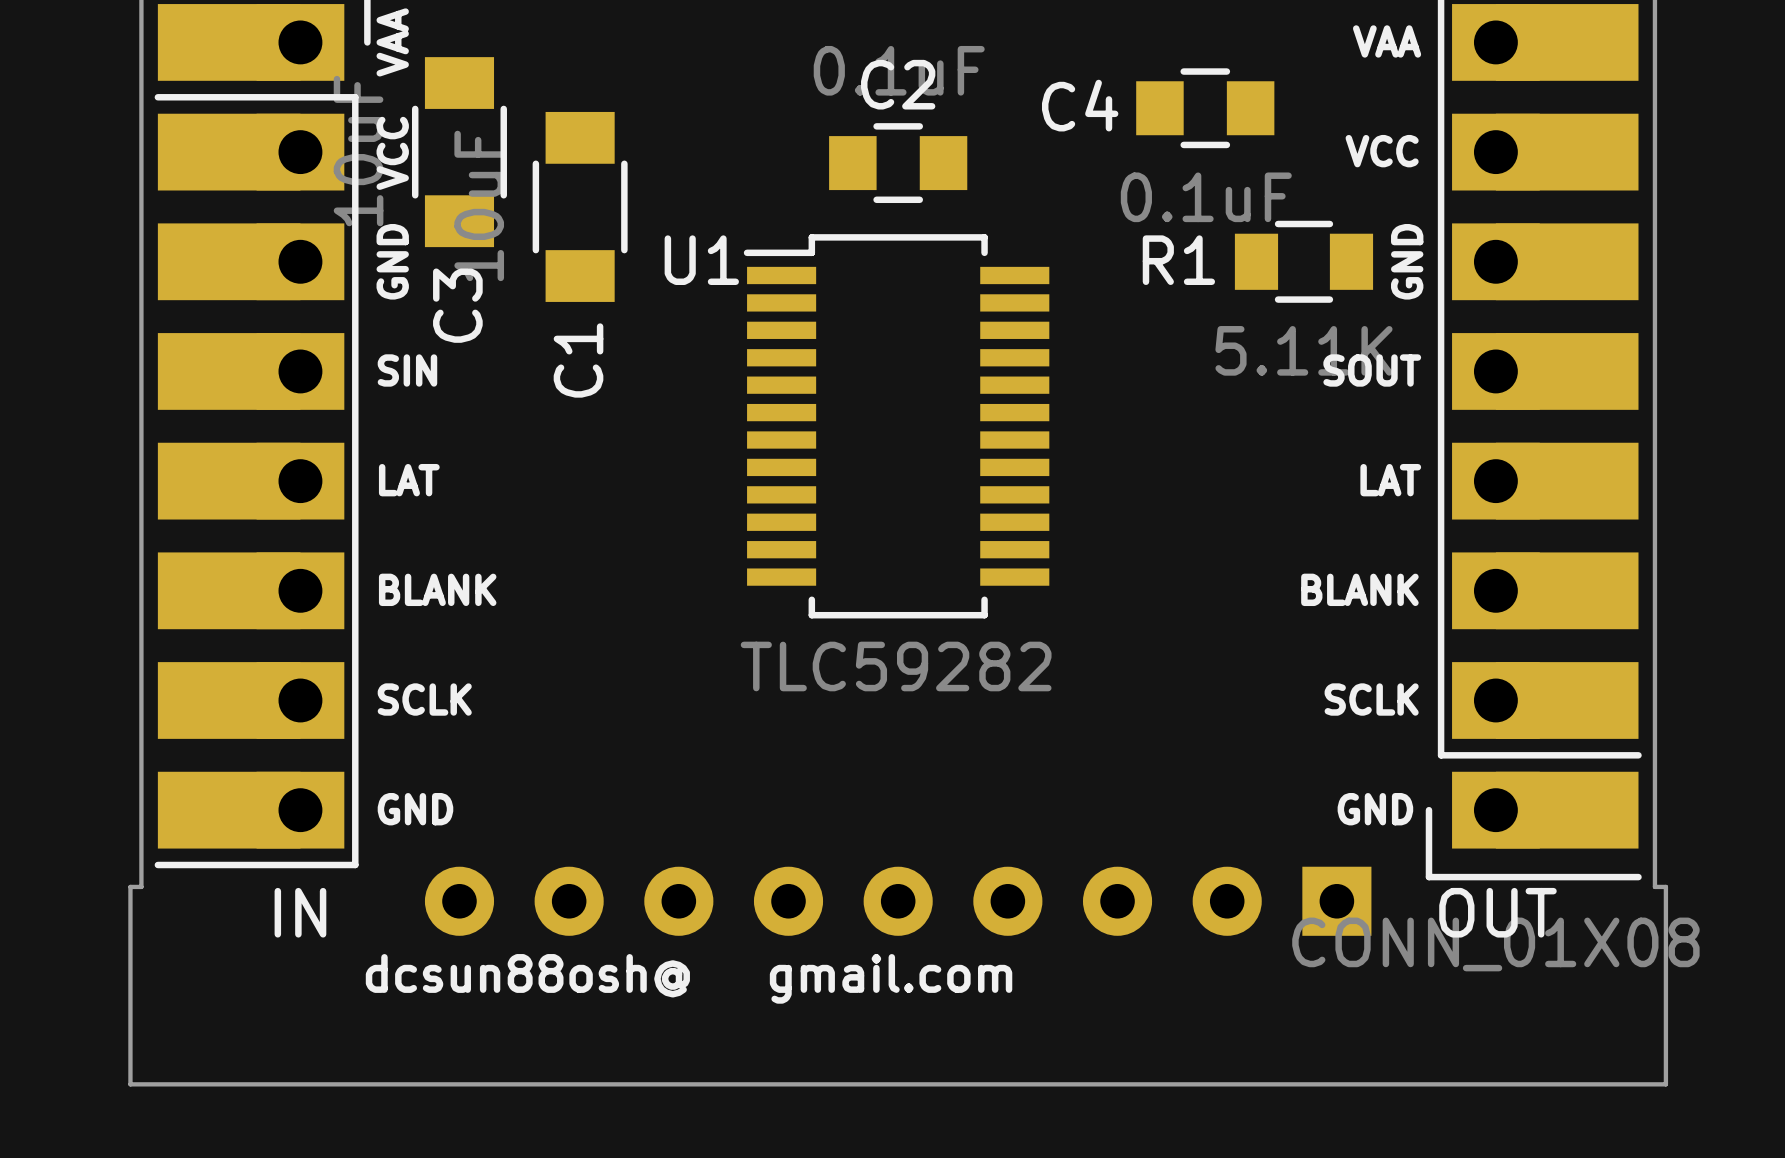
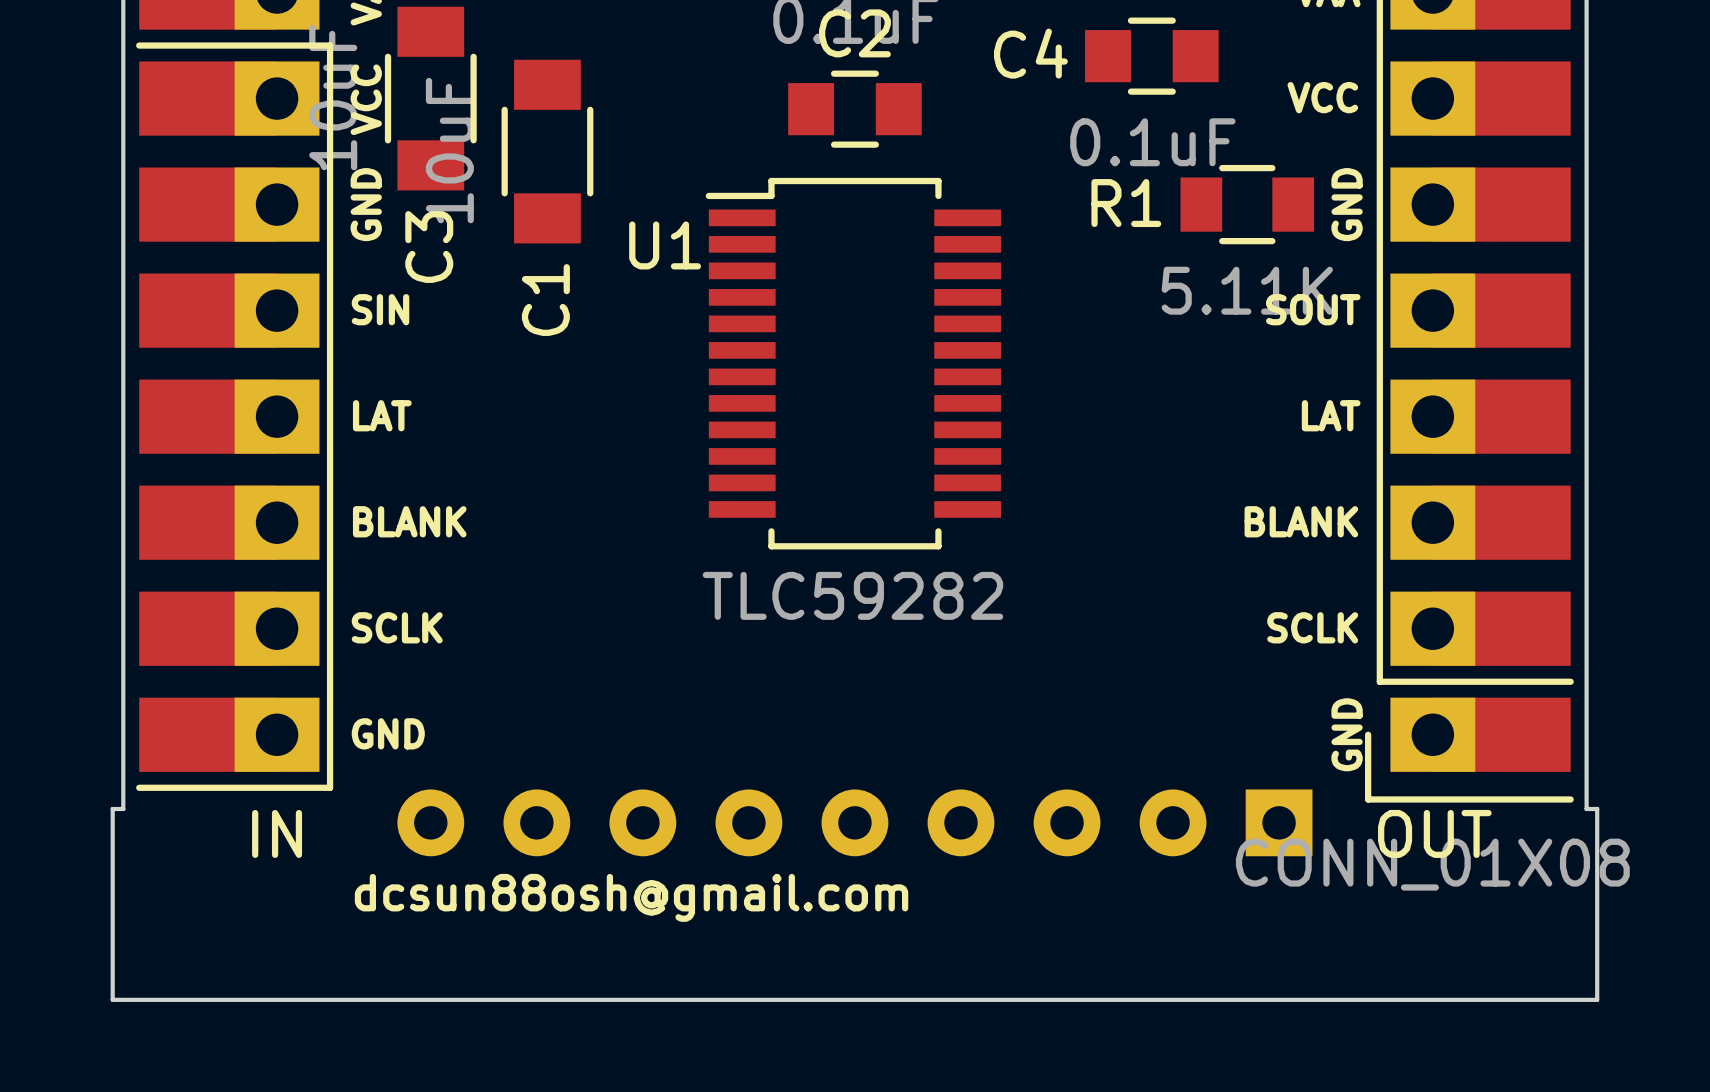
U1 name position: U1 (701, 260) -> U1 (665, 245)
text rotation: 0° (1375, 809) -> 90° counterclockwise (1347, 734)
text: dcsun88osh@ gmail.com (689, 978) -> dcsun88osh@gmail.com (631, 897)

